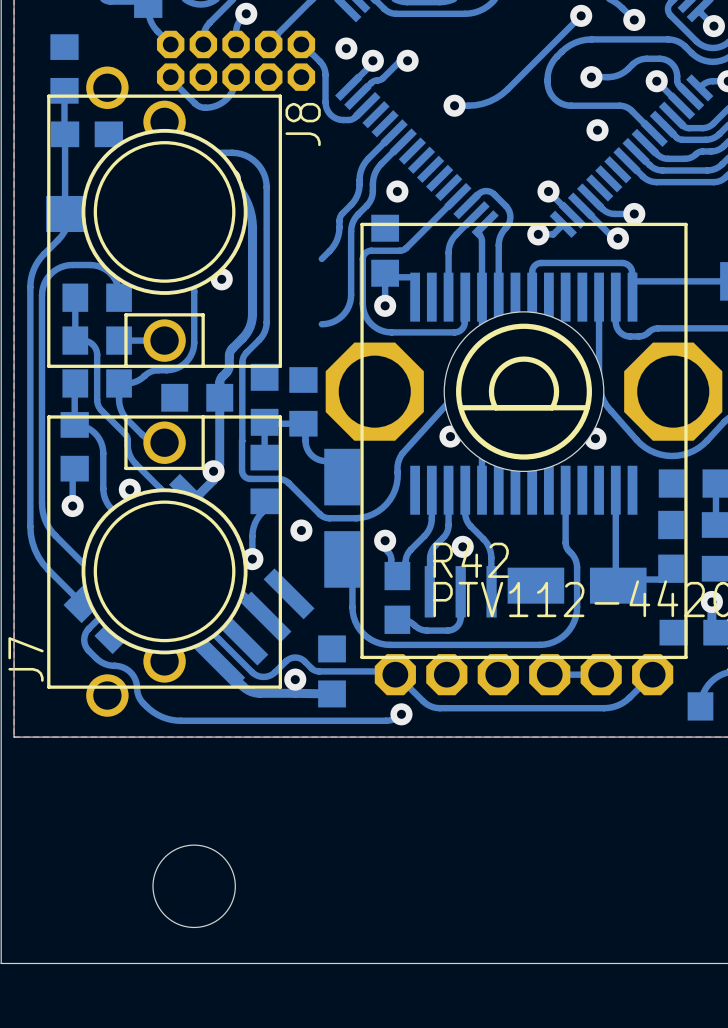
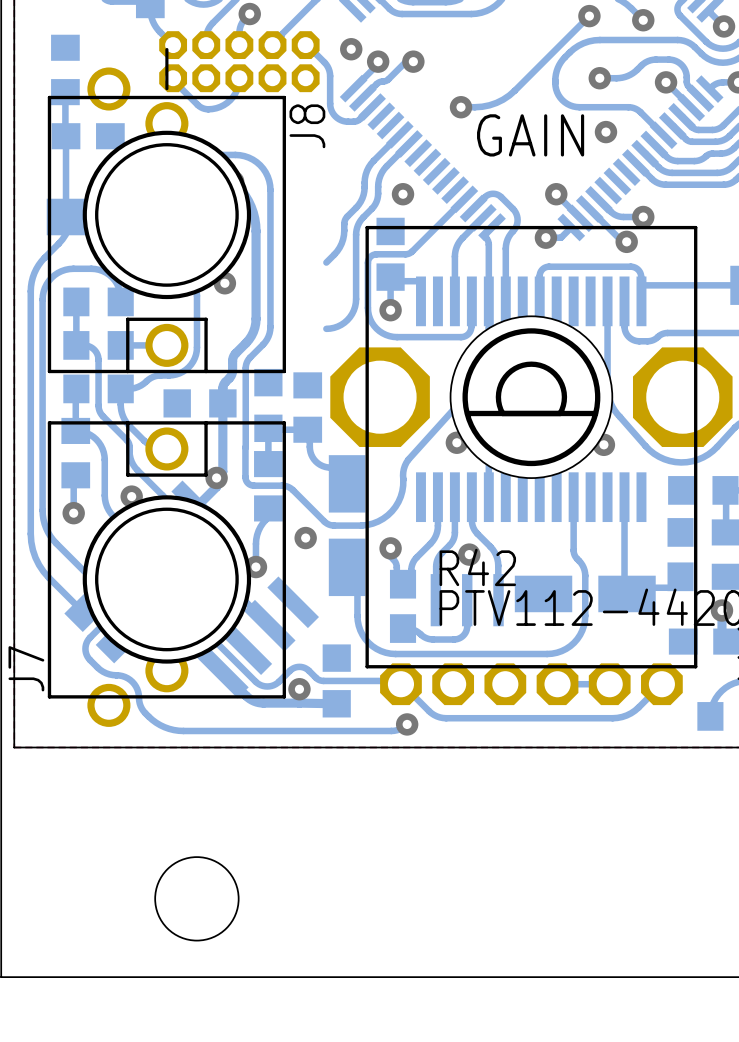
text: none -> I (166, 69)
text: none -> GAIN (530, 135)

